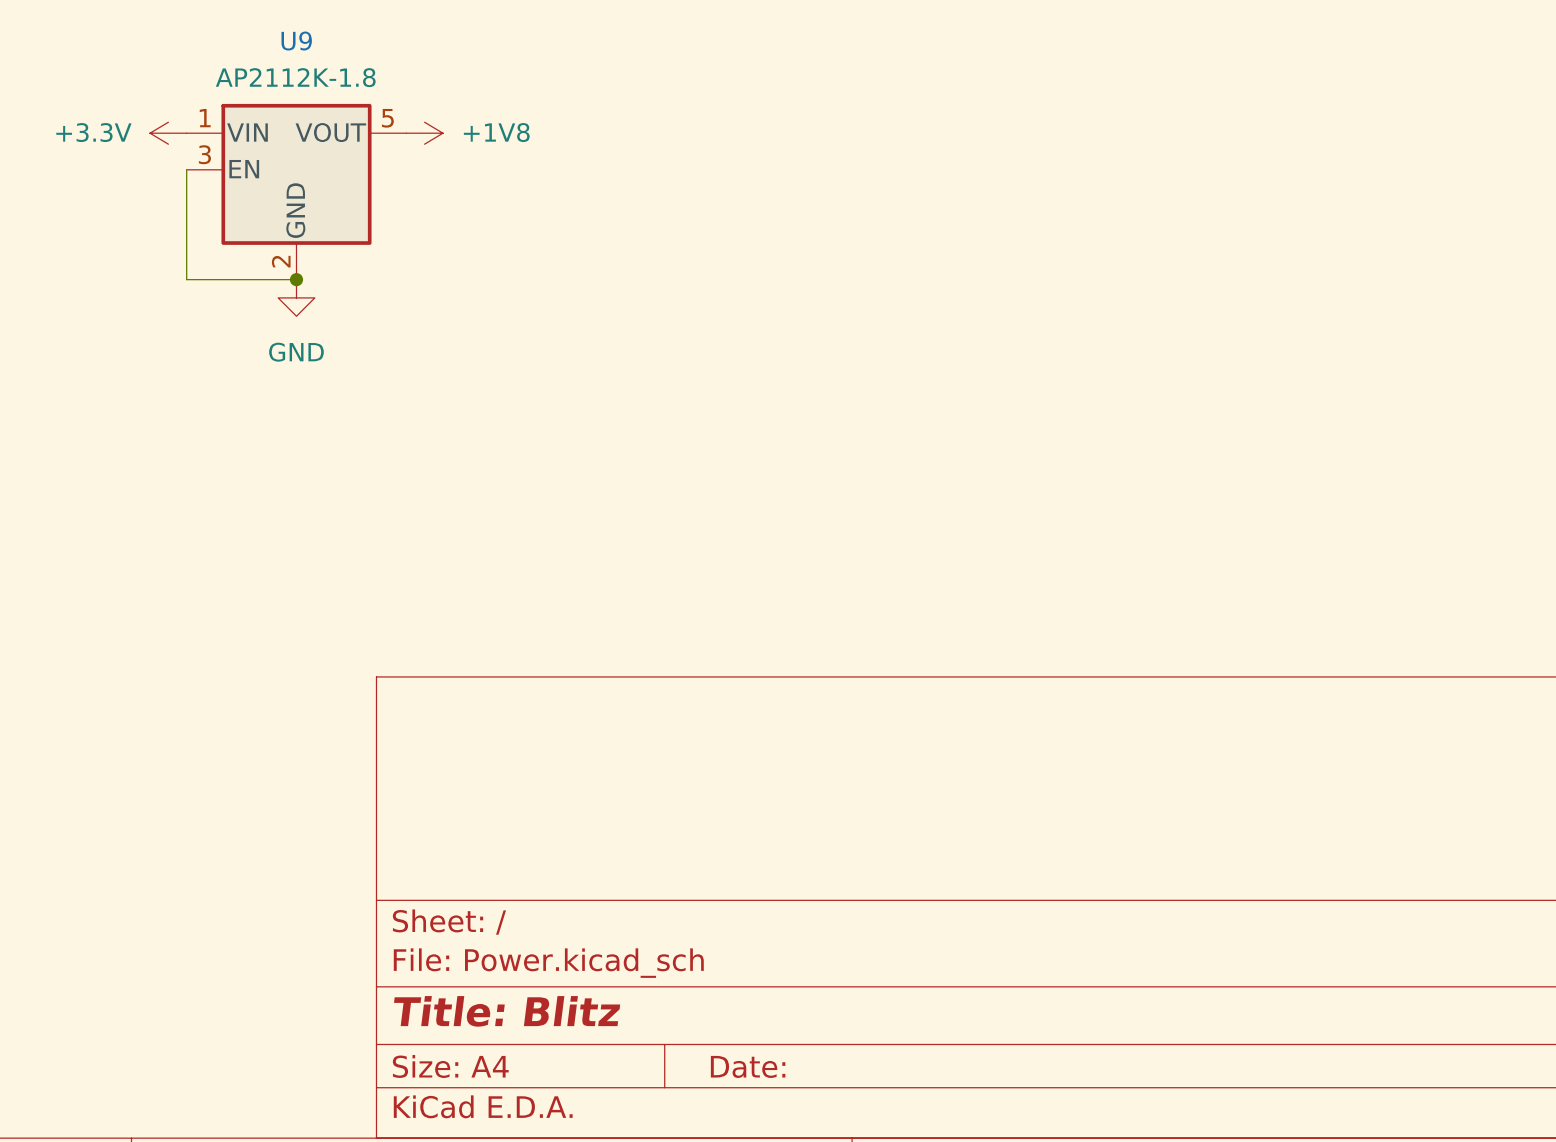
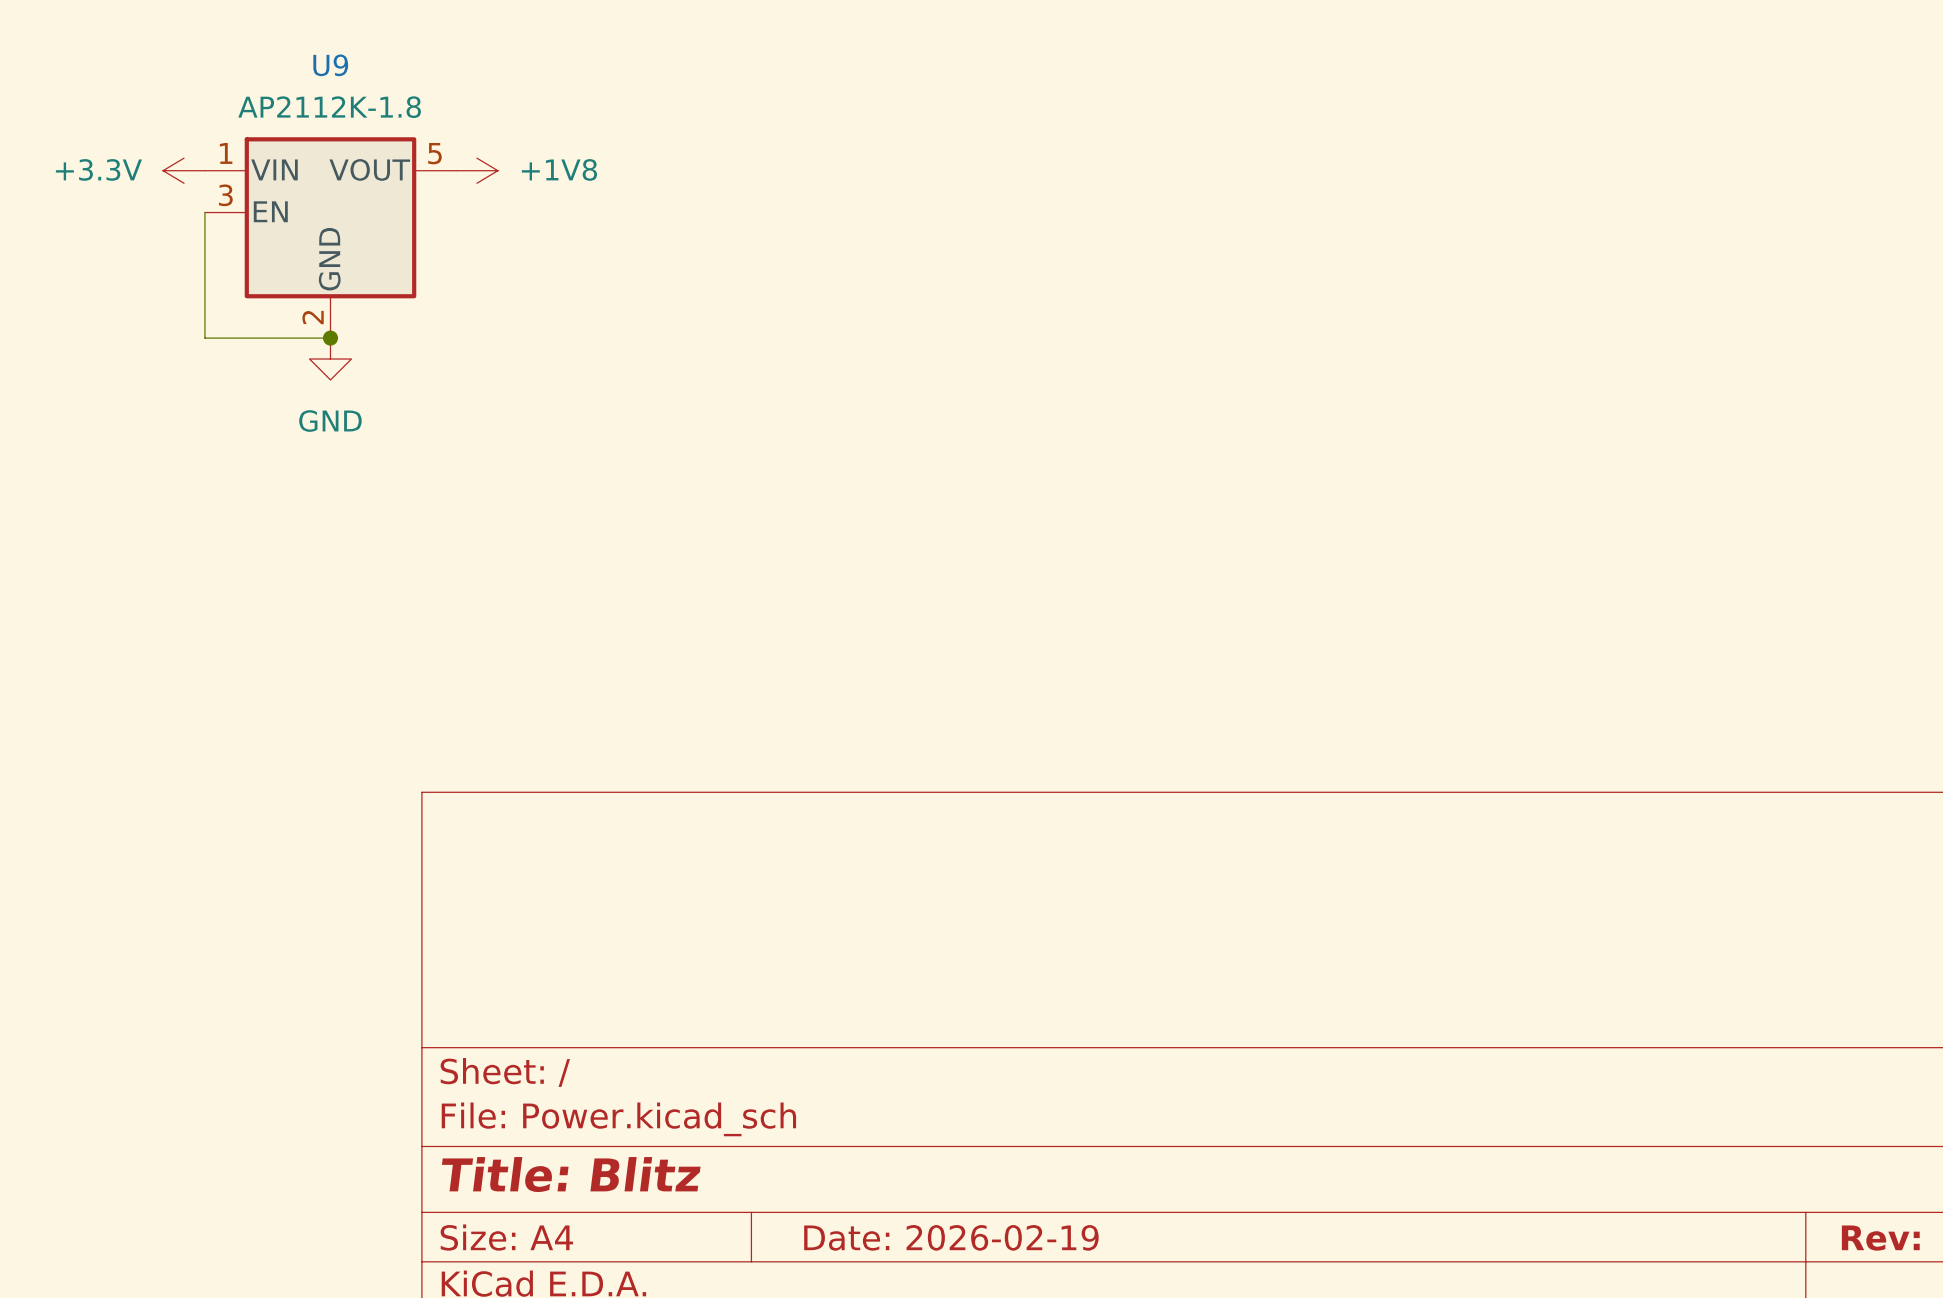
title block: Date: (748, 1066) -> Date: 2026-02-19 (951, 1237)

